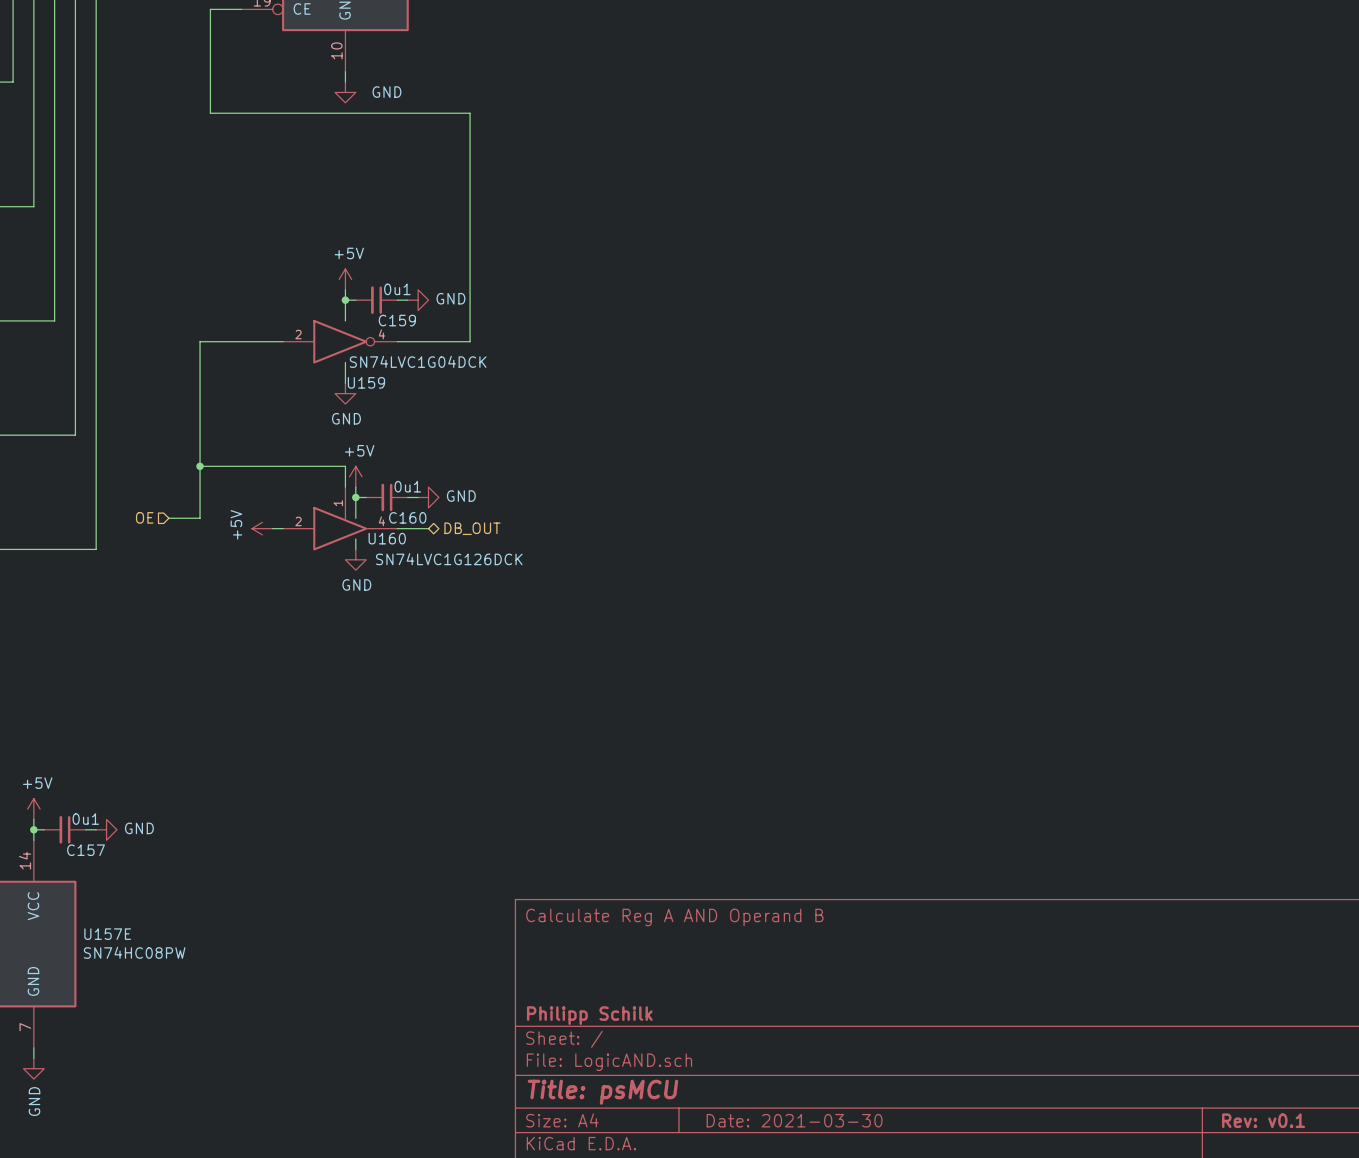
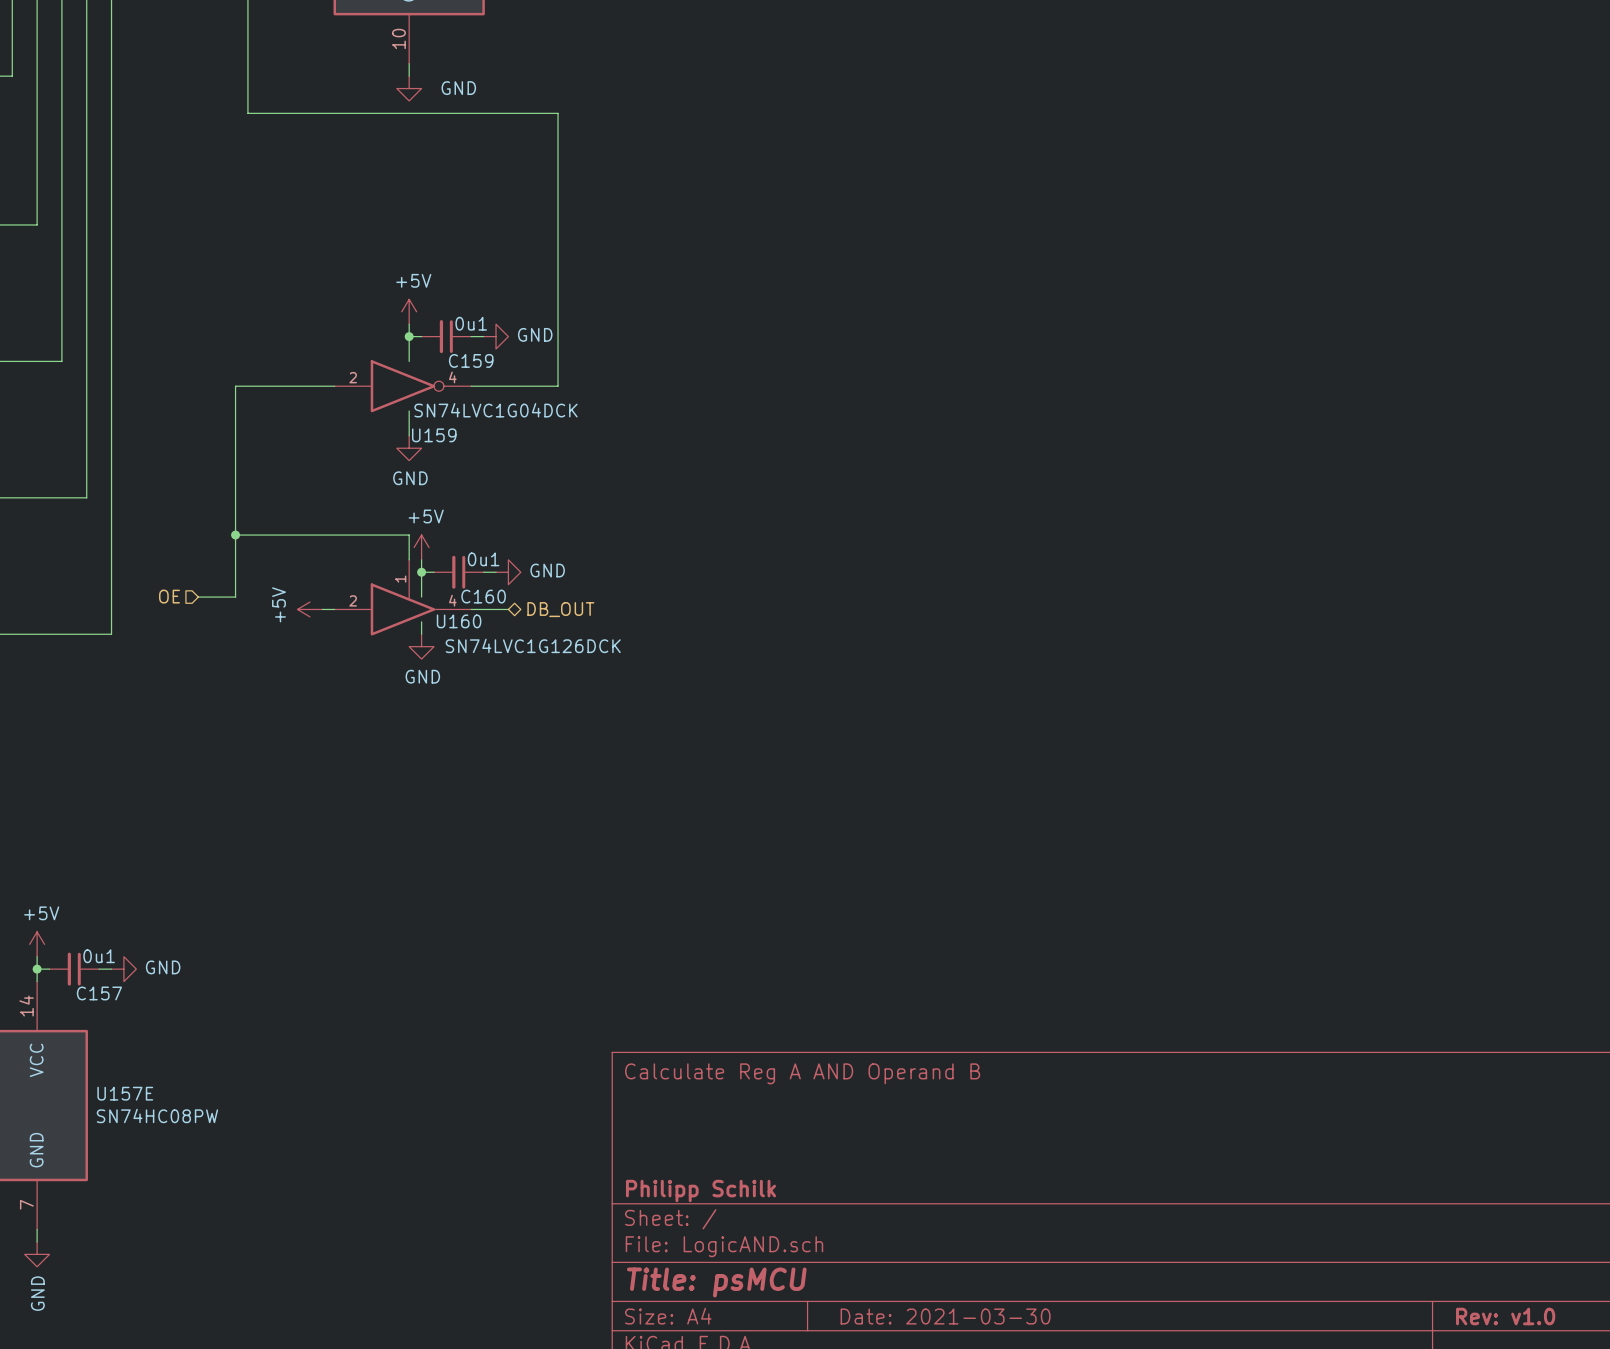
title block: Rev: v0.1 (1263, 1120) -> Rev: v1.0 (1505, 1316)

